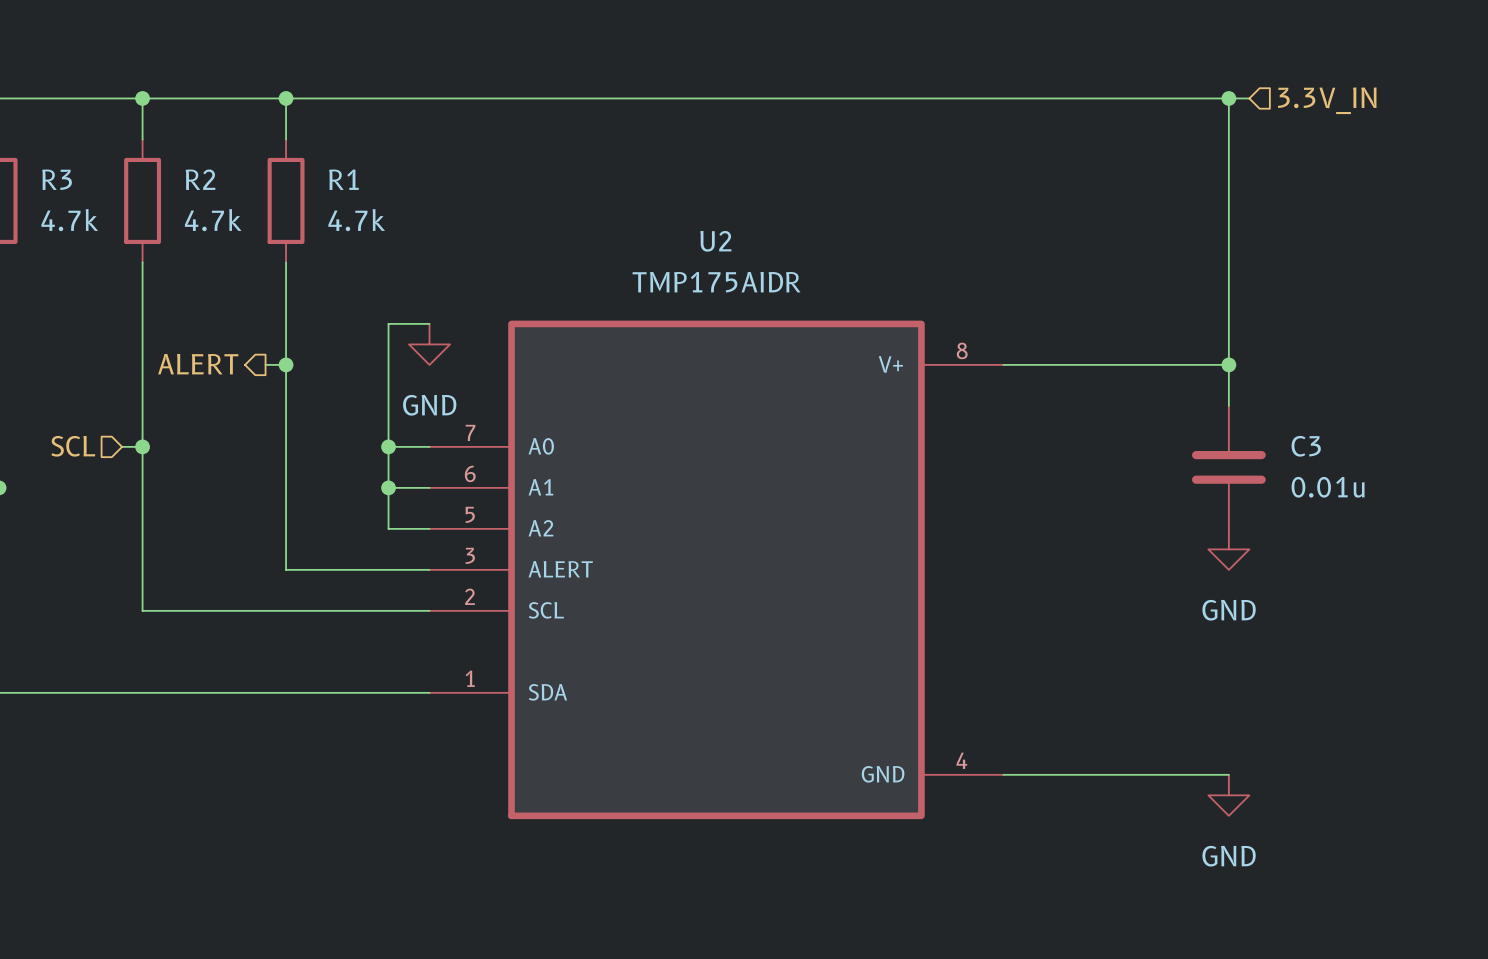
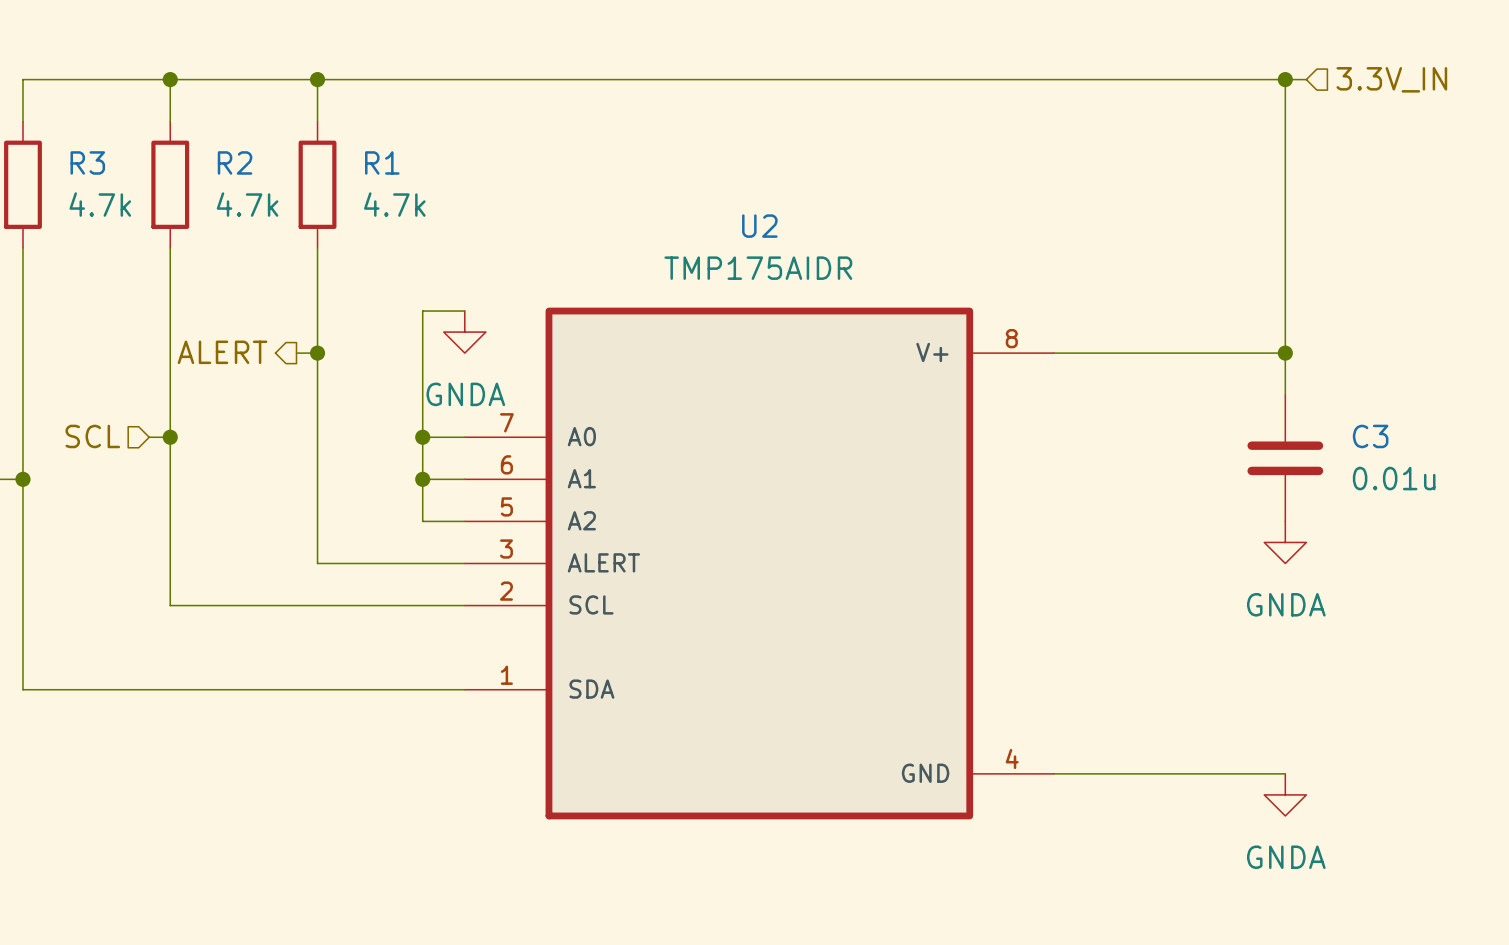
power symbol: GND (429, 344) -> GNDA (464, 332)
power symbol: GND (1228, 549) -> GNDA (1285, 542)
power symbol: GND (1228, 795) -> GNDA (1285, 794)

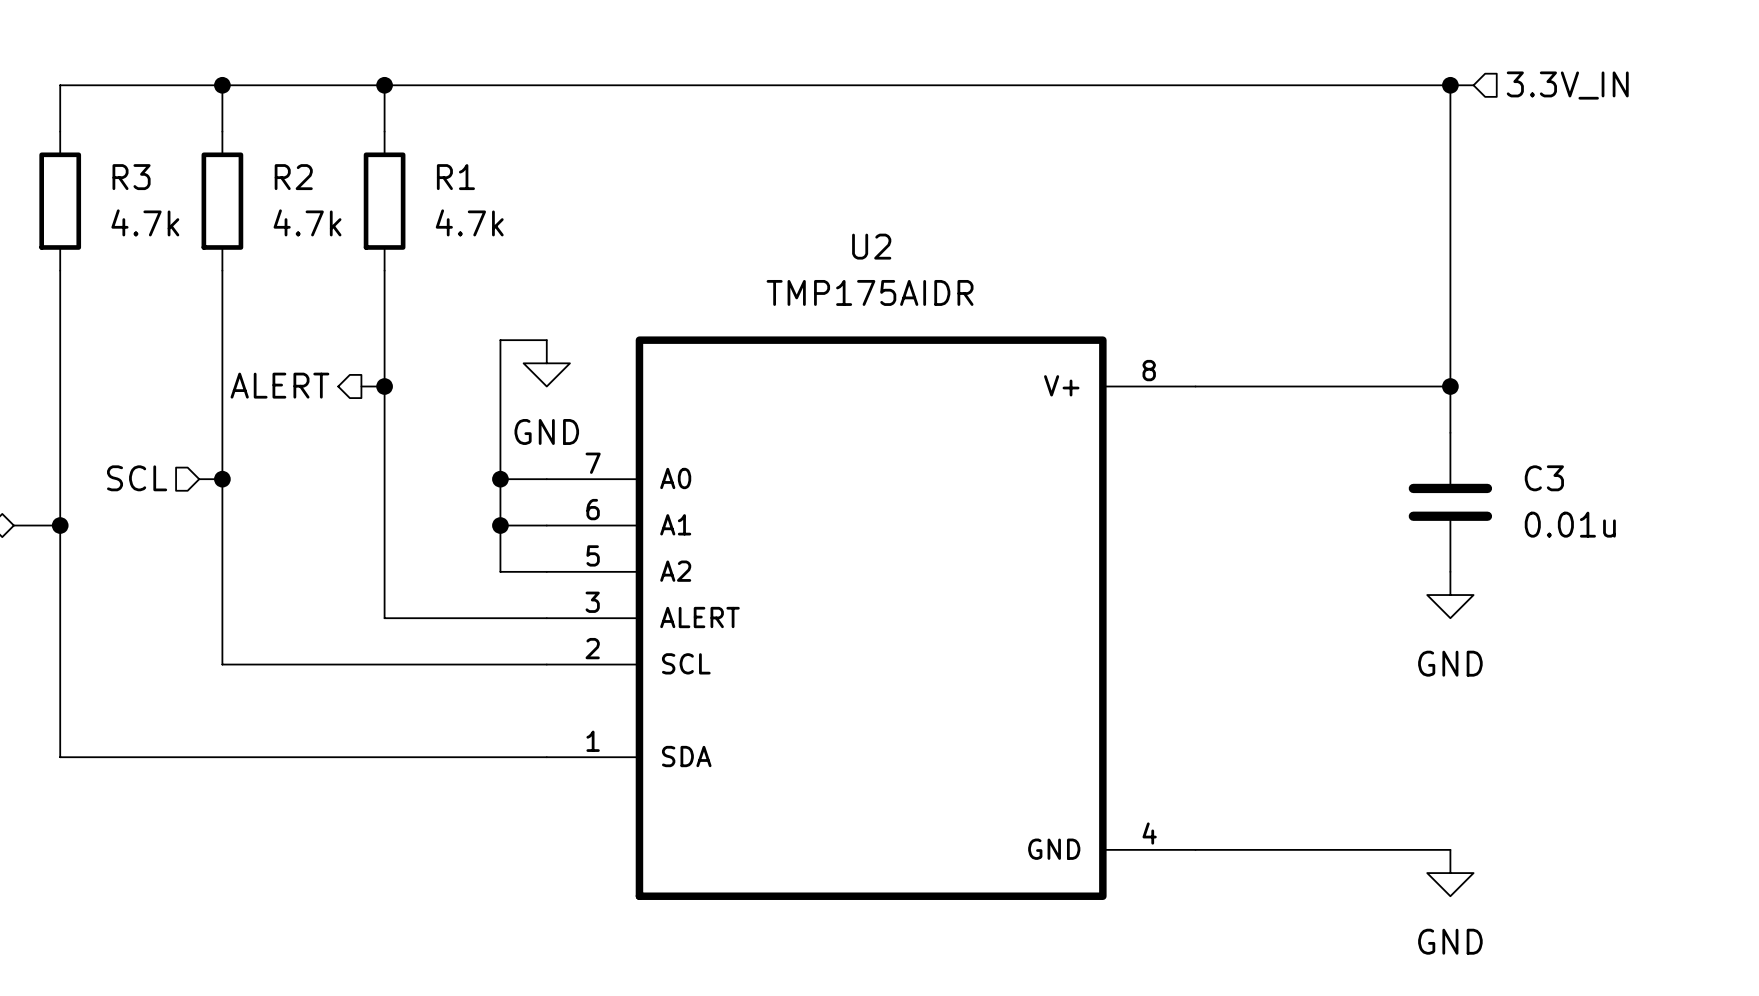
power symbol: GNDA (464, 332) -> GND (546, 363)
power symbol: GNDA (1285, 542) -> GND (1450, 595)
power symbol: GNDA (1285, 794) -> GND (1450, 873)

